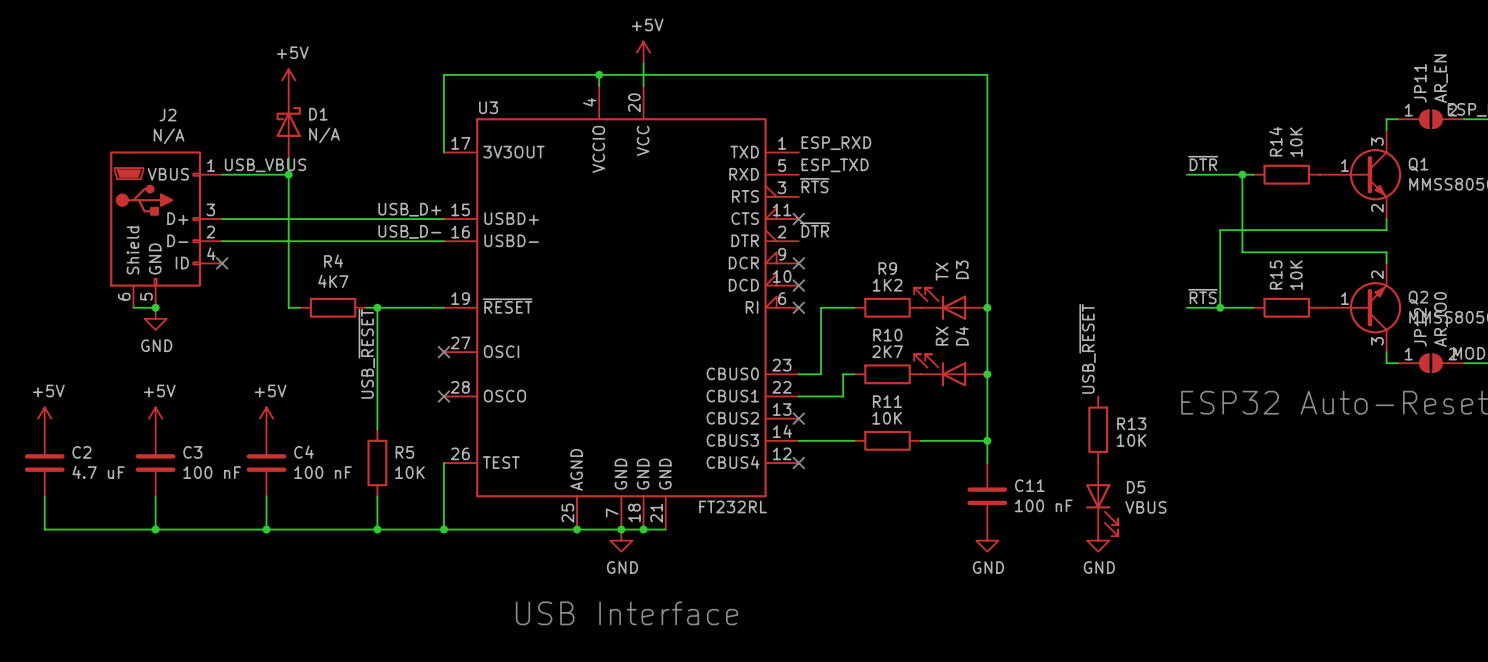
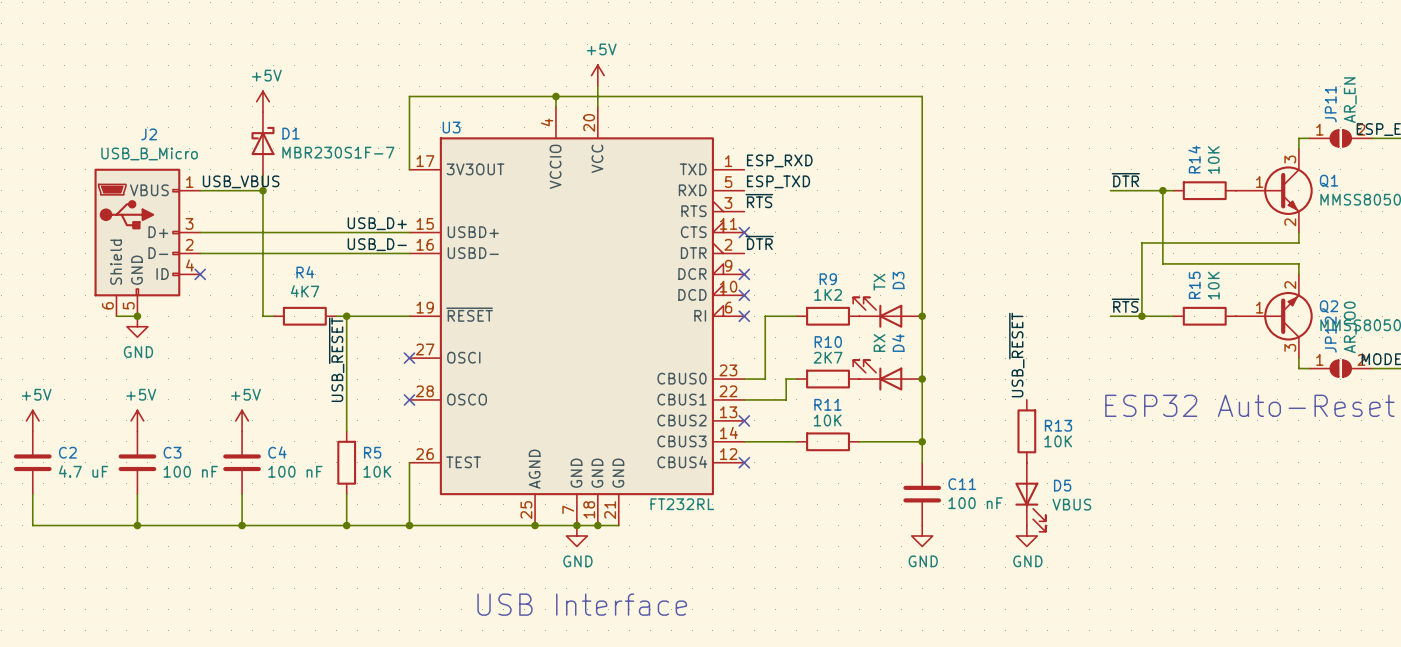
D1 value: N/A (324, 135) -> MBR230S1F-7 (338, 152)
J2 value: N/A (169, 136) -> USB_B_Micro (149, 153)

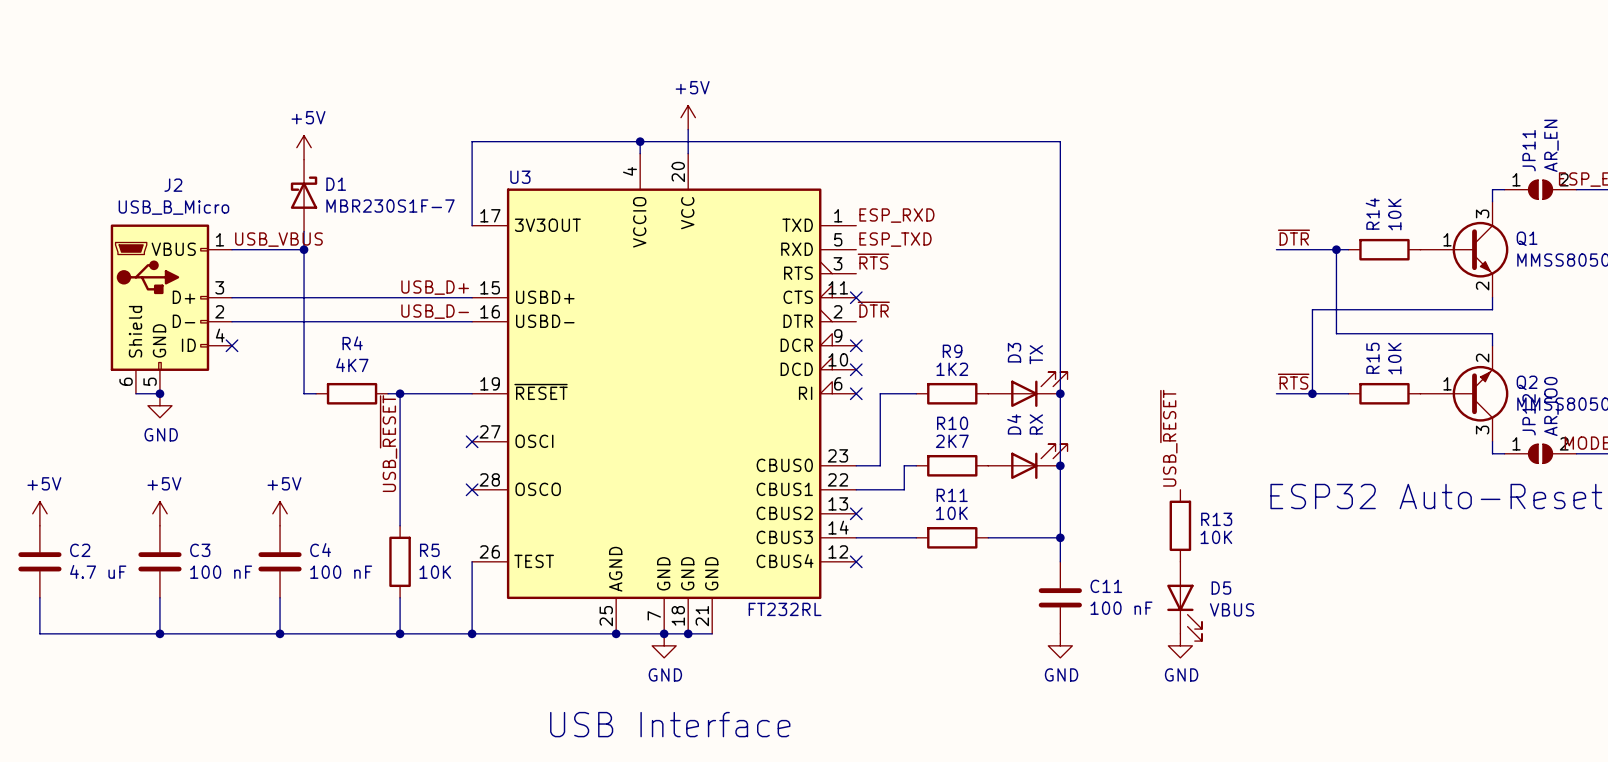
D3 flip: as is (877, 312) -> left-right (1039, 389)
D4 flip: as is (877, 375) -> left-right (1039, 461)

